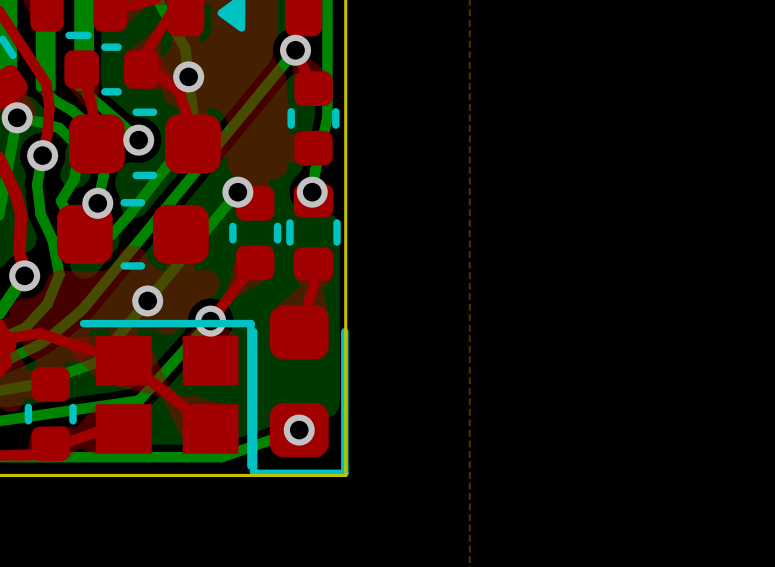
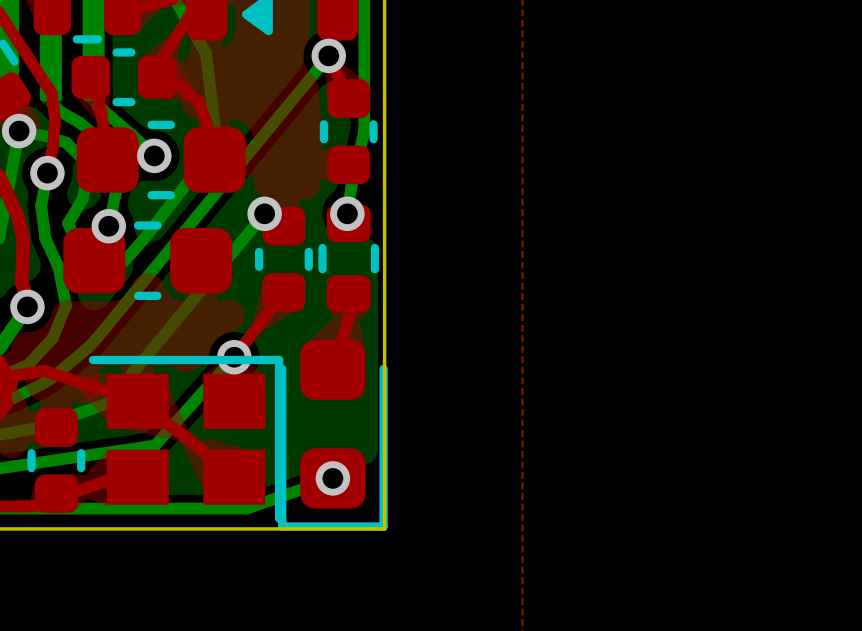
via: (188, 76) -> none
via: (147, 300) -> none

